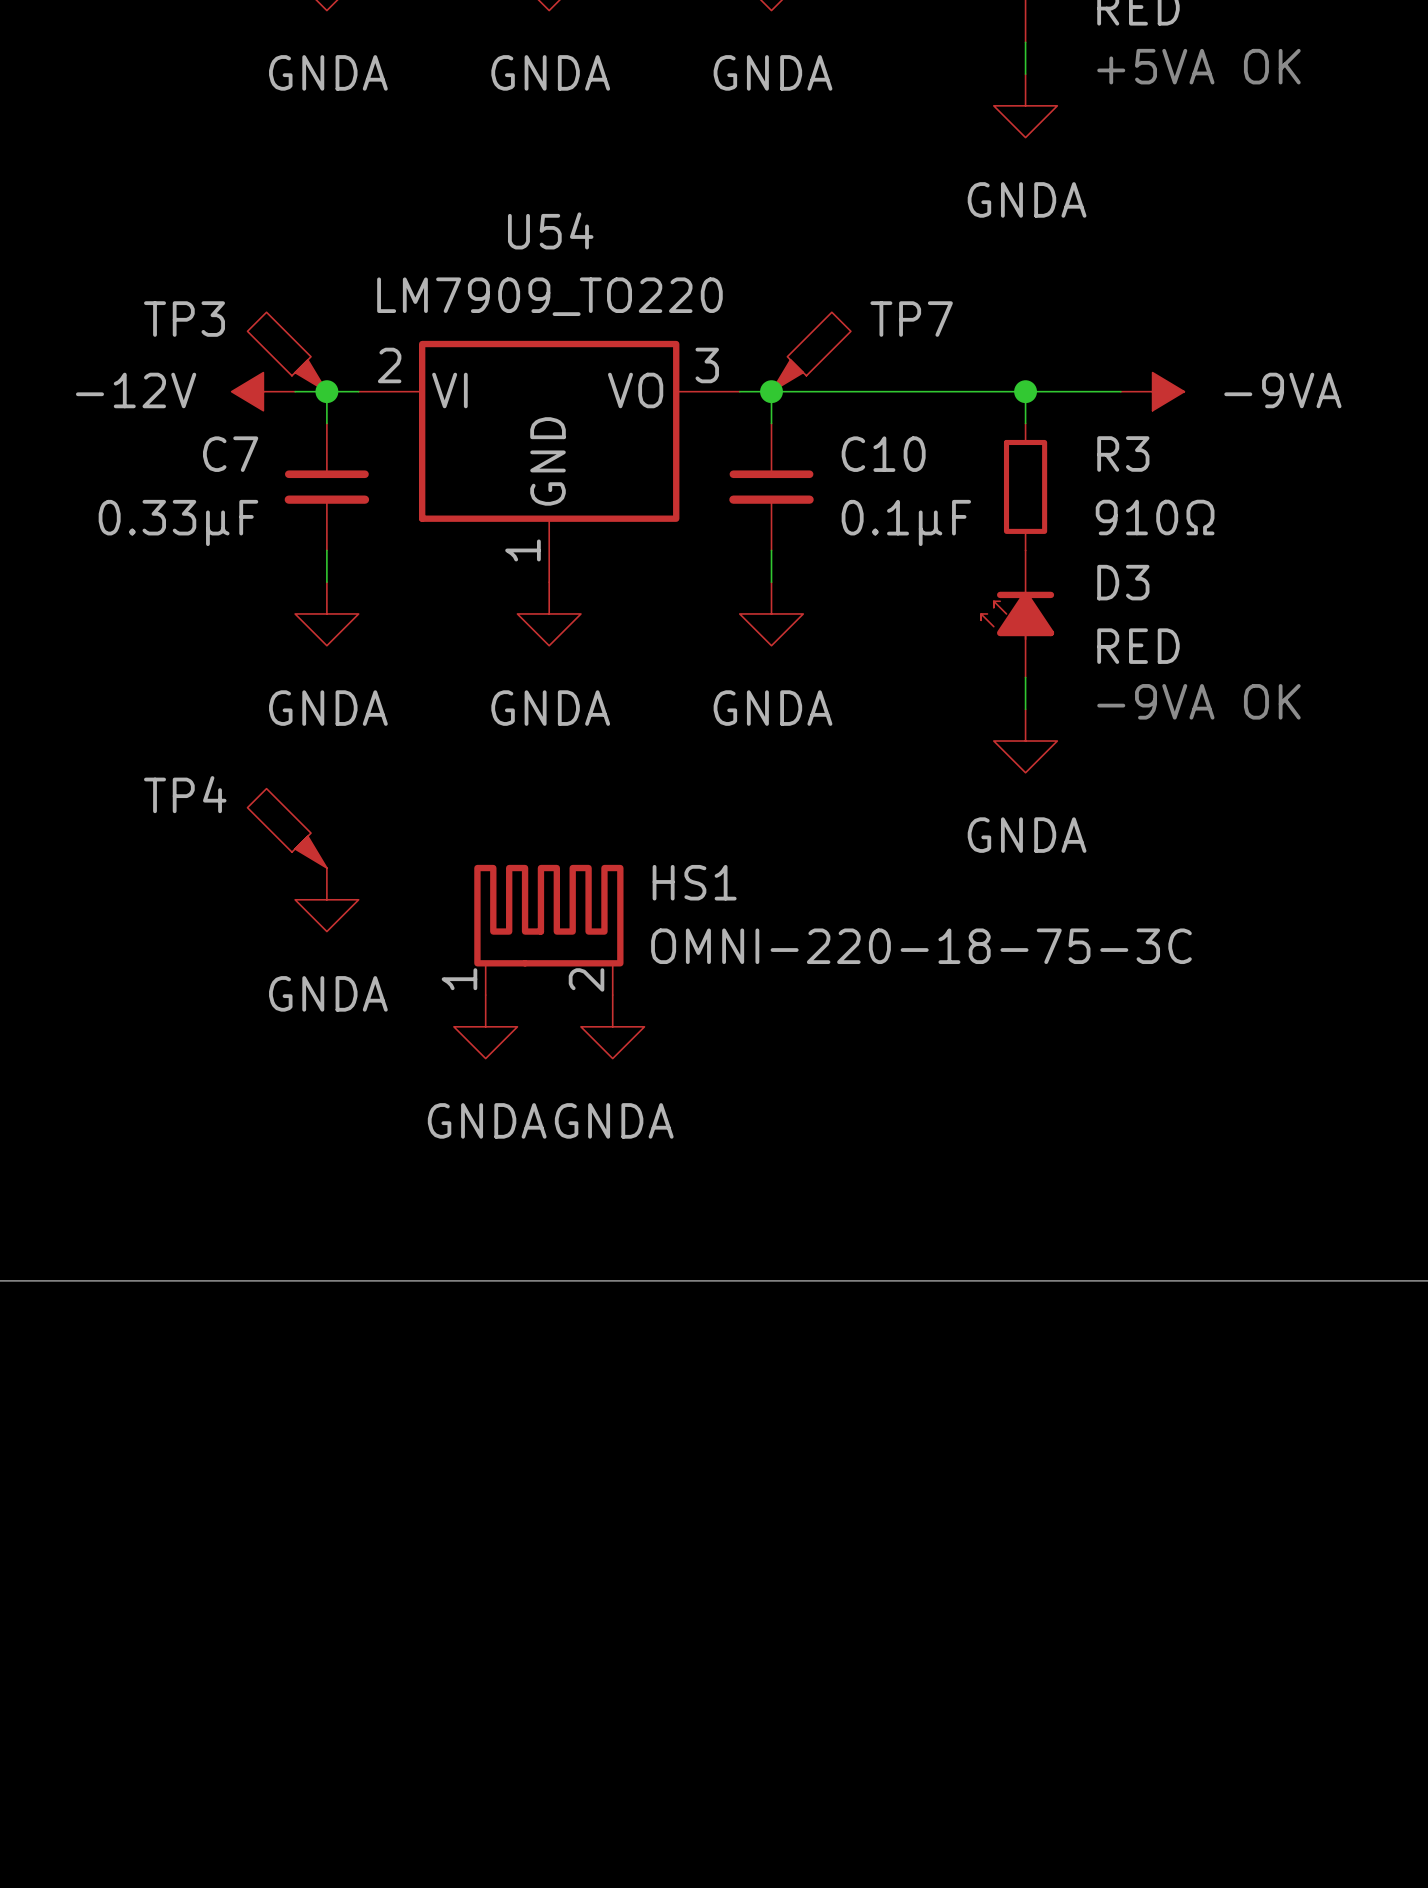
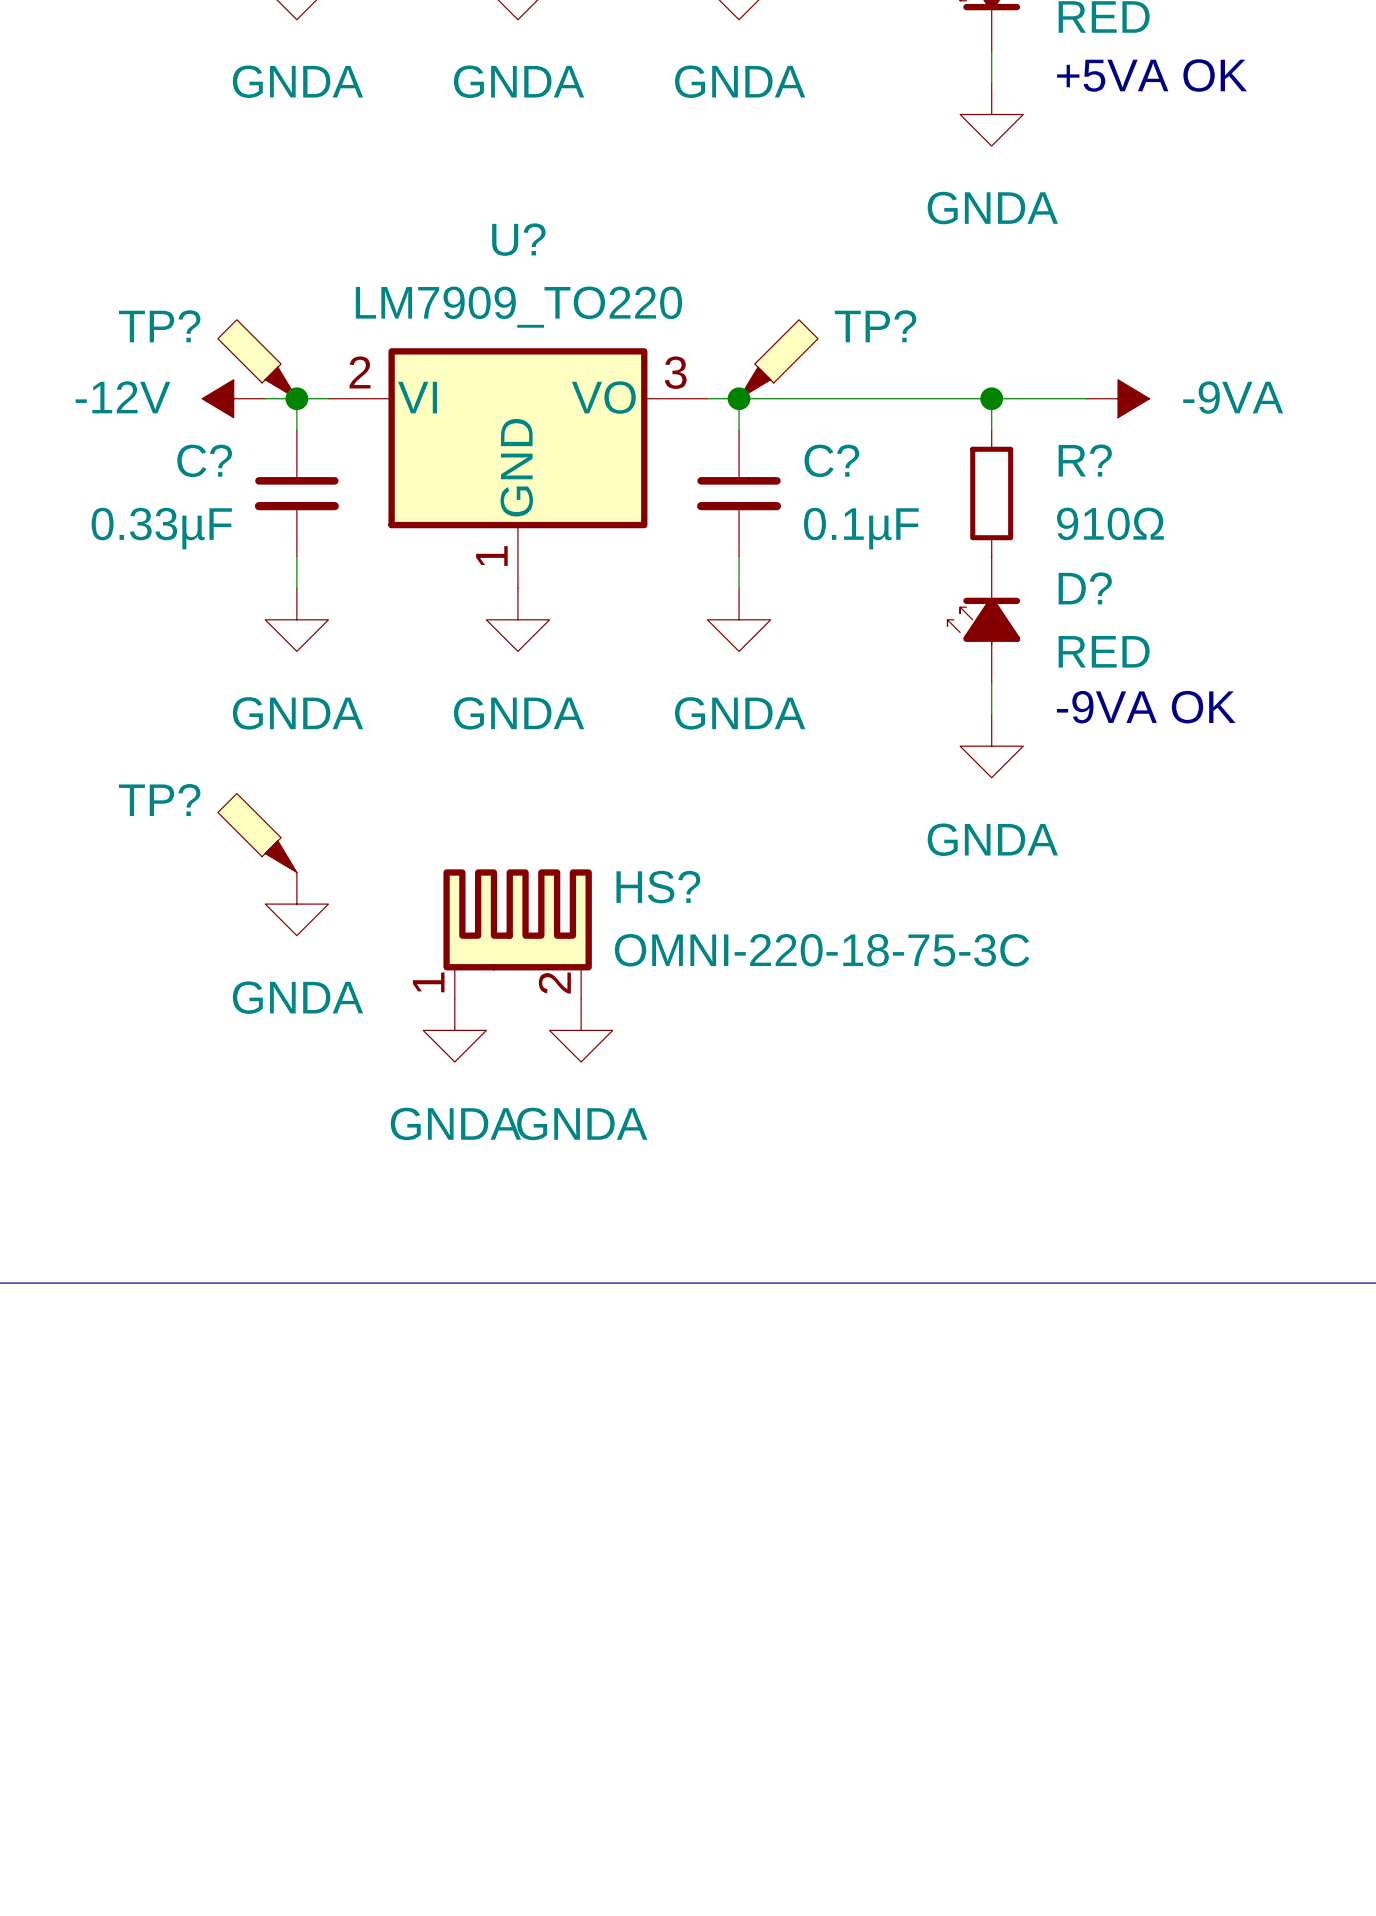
U54 name: U54 (550, 230) -> U? (518, 239)
TP3 name: TP3 (184, 319) -> TP? (159, 326)
TP7 name: TP7 (911, 319) -> TP? (875, 326)
R3 name: R3 (1123, 453) -> R? (1085, 460)
C7 name: C7 (230, 454) -> C? (204, 460)
C10 name: C10 (883, 454) -> C? (831, 460)
D3 name: D3 (1123, 582) -> D? (1085, 588)
TP4 name: TP4 (185, 794) -> TP? (159, 800)
HS1 name: HS1 (694, 882) -> HS? (658, 887)

